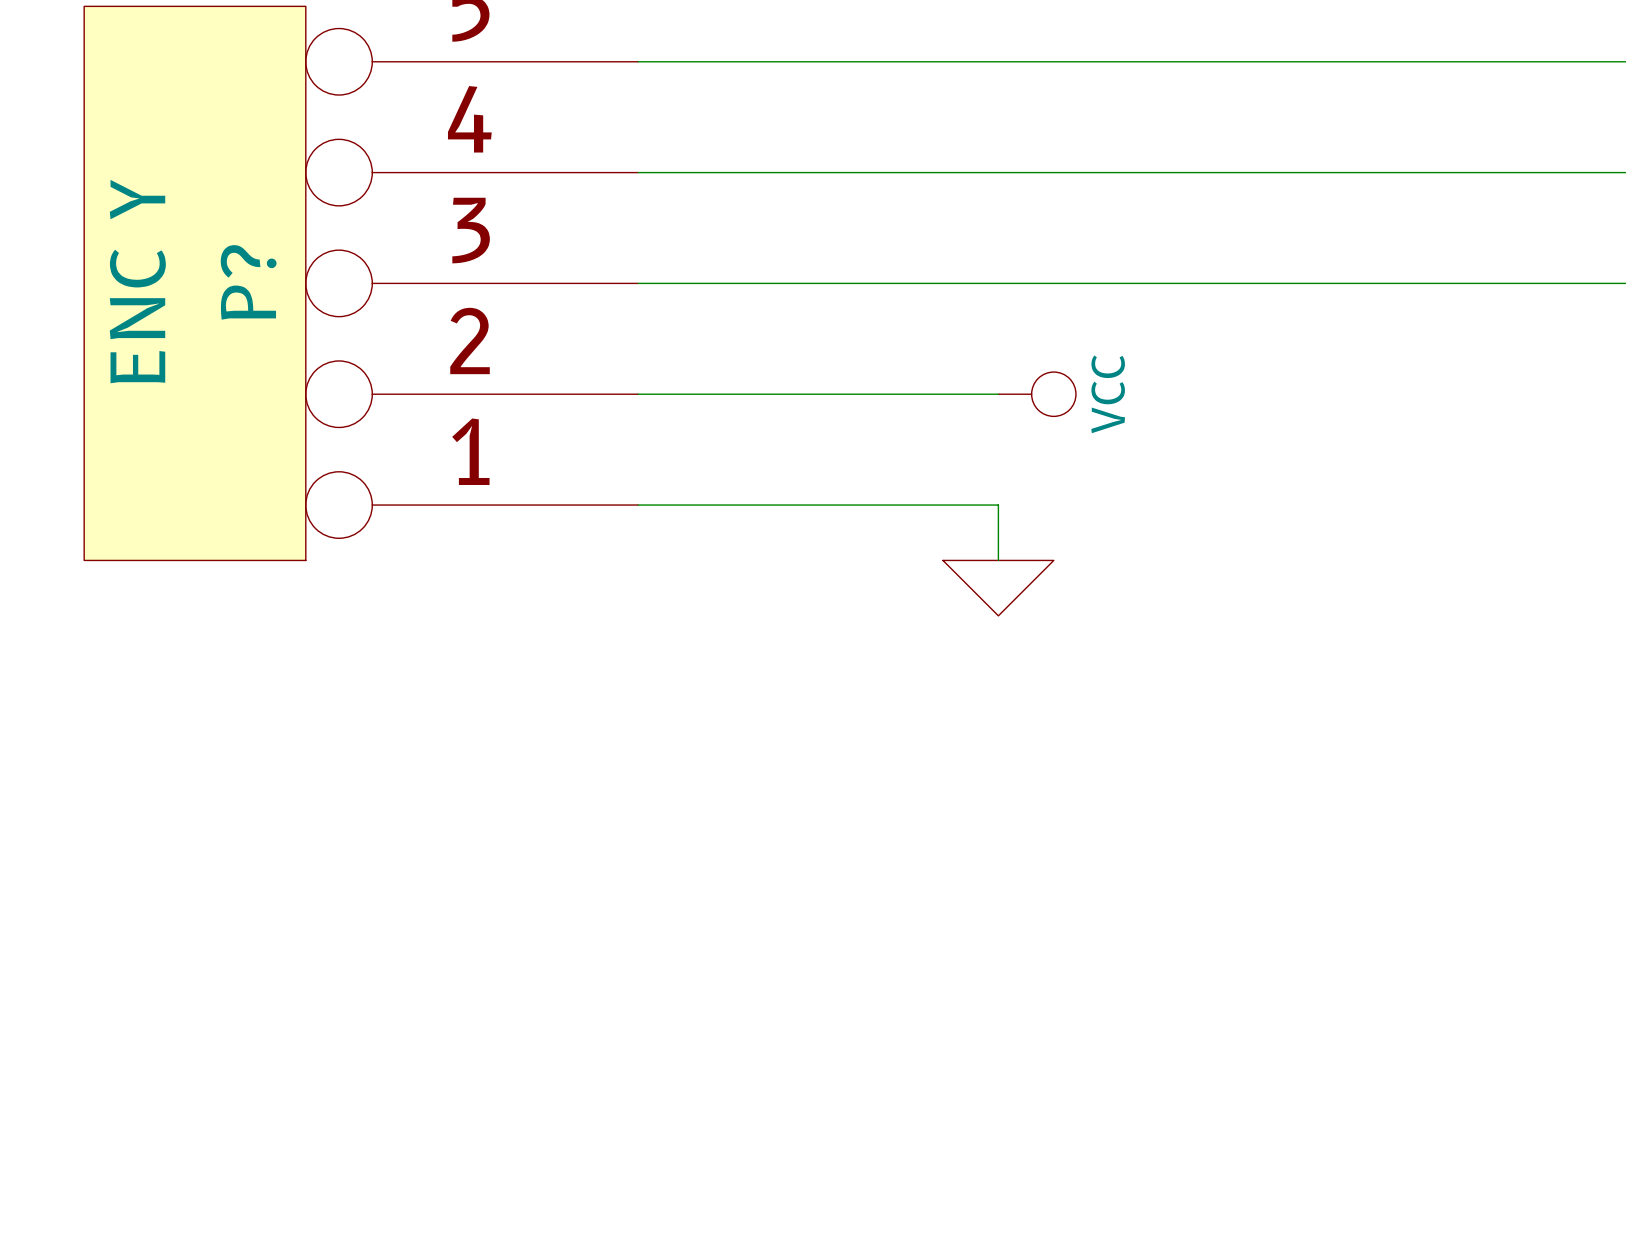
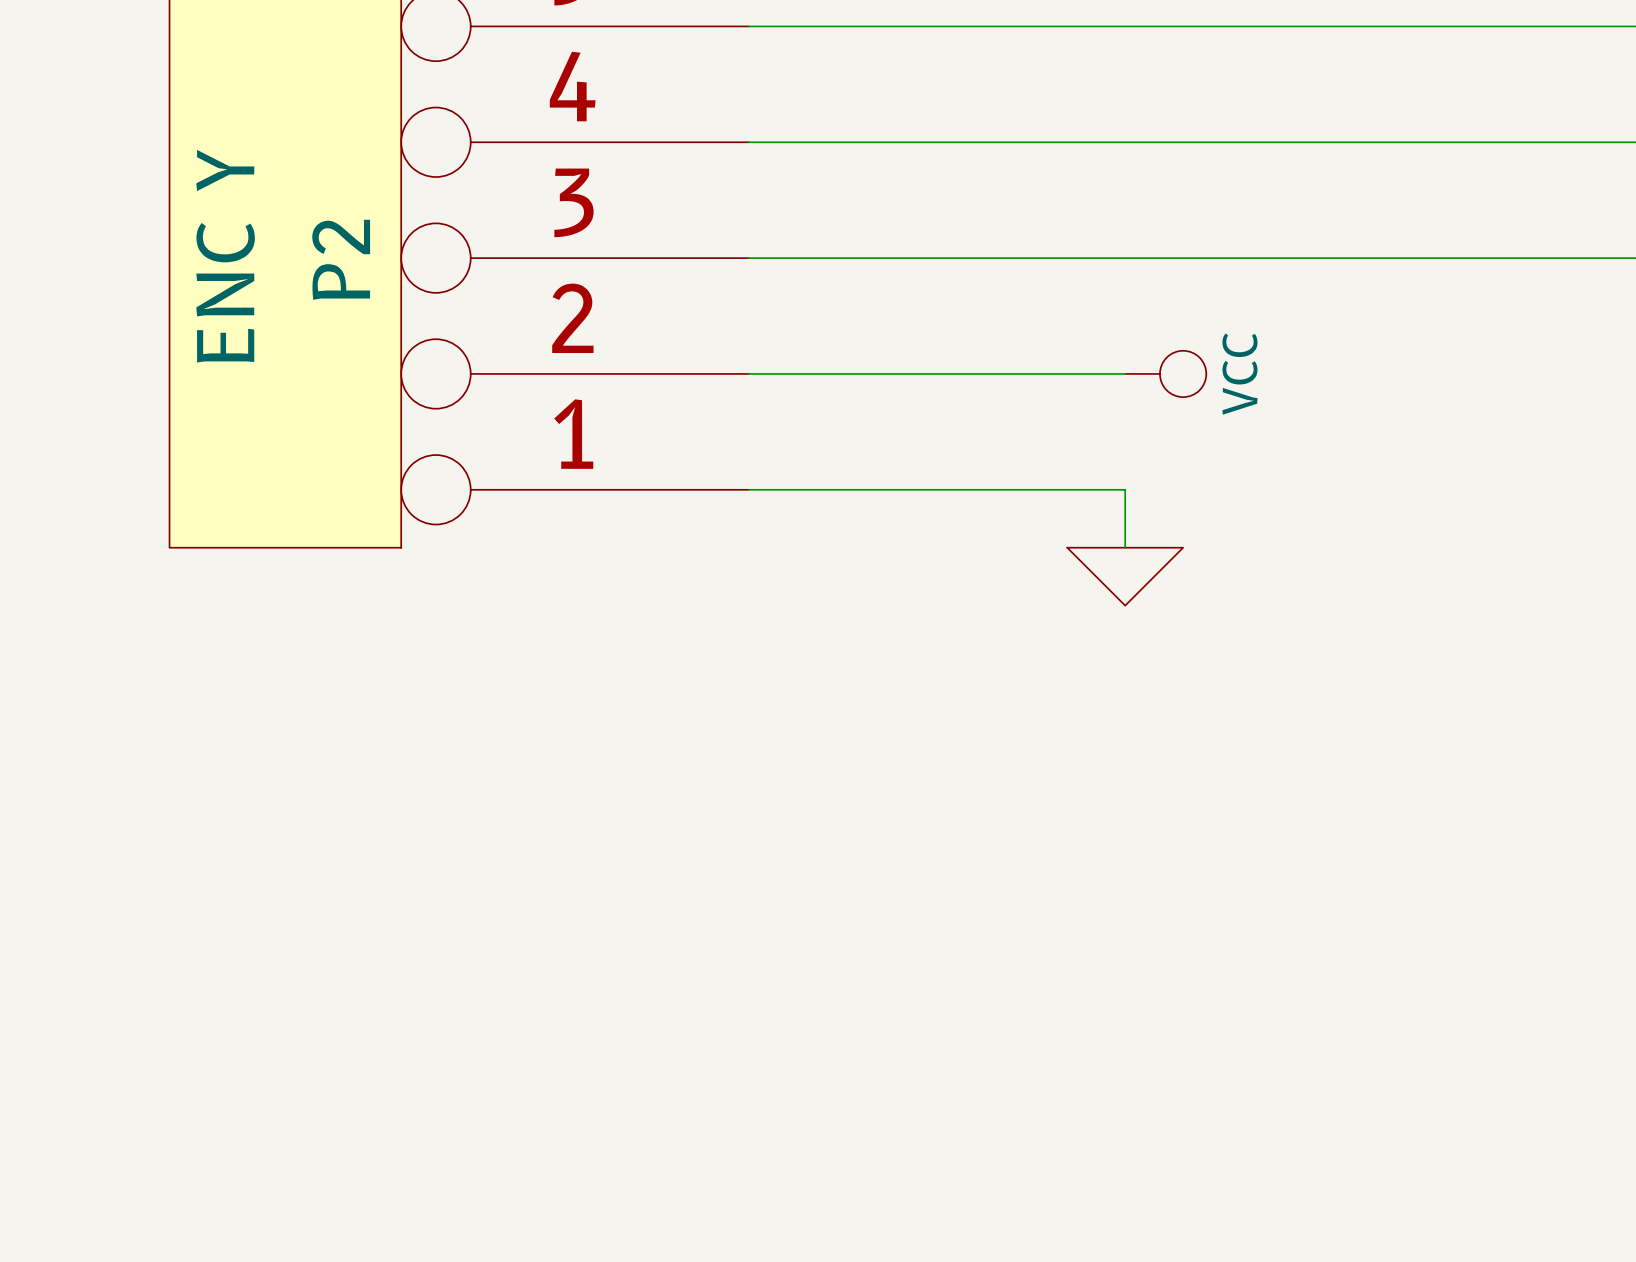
P? name: P? (248, 282) -> P2 (341, 259)

